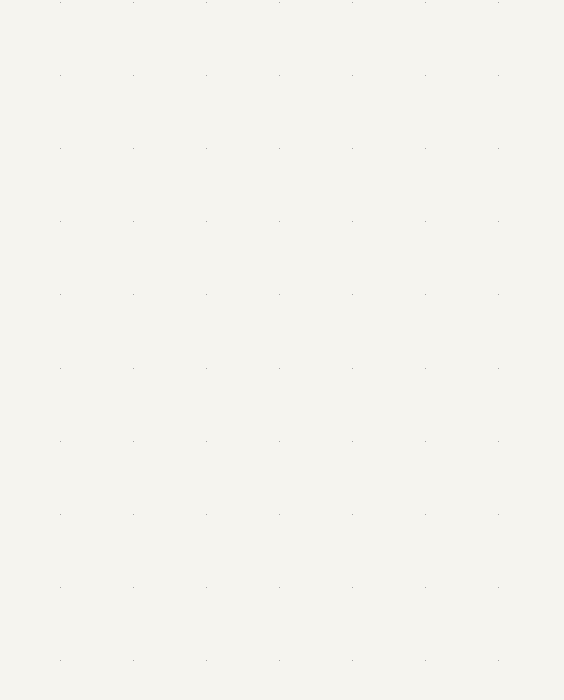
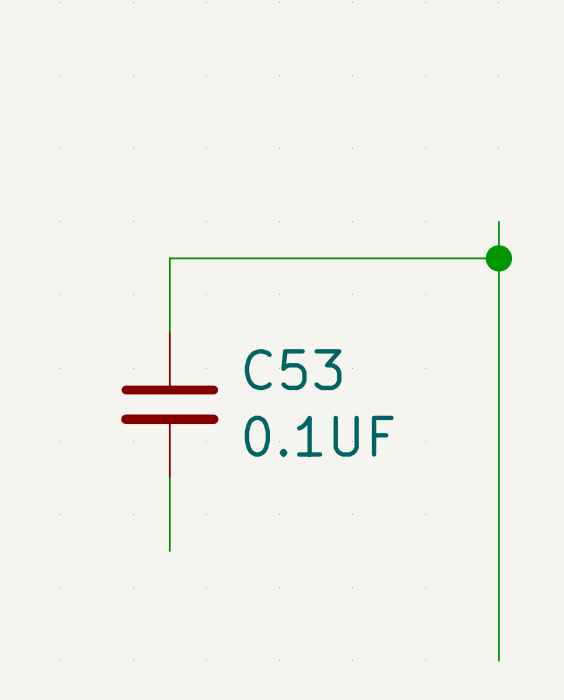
wire: none -> (498, 221) (498, 660)
wire: none -> (498, 258) (169, 258) (169, 331)
junction: none -> (498, 258)
C53: none -> 0.1UF (169, 404)
wire: none -> (169, 477) (169, 550)

